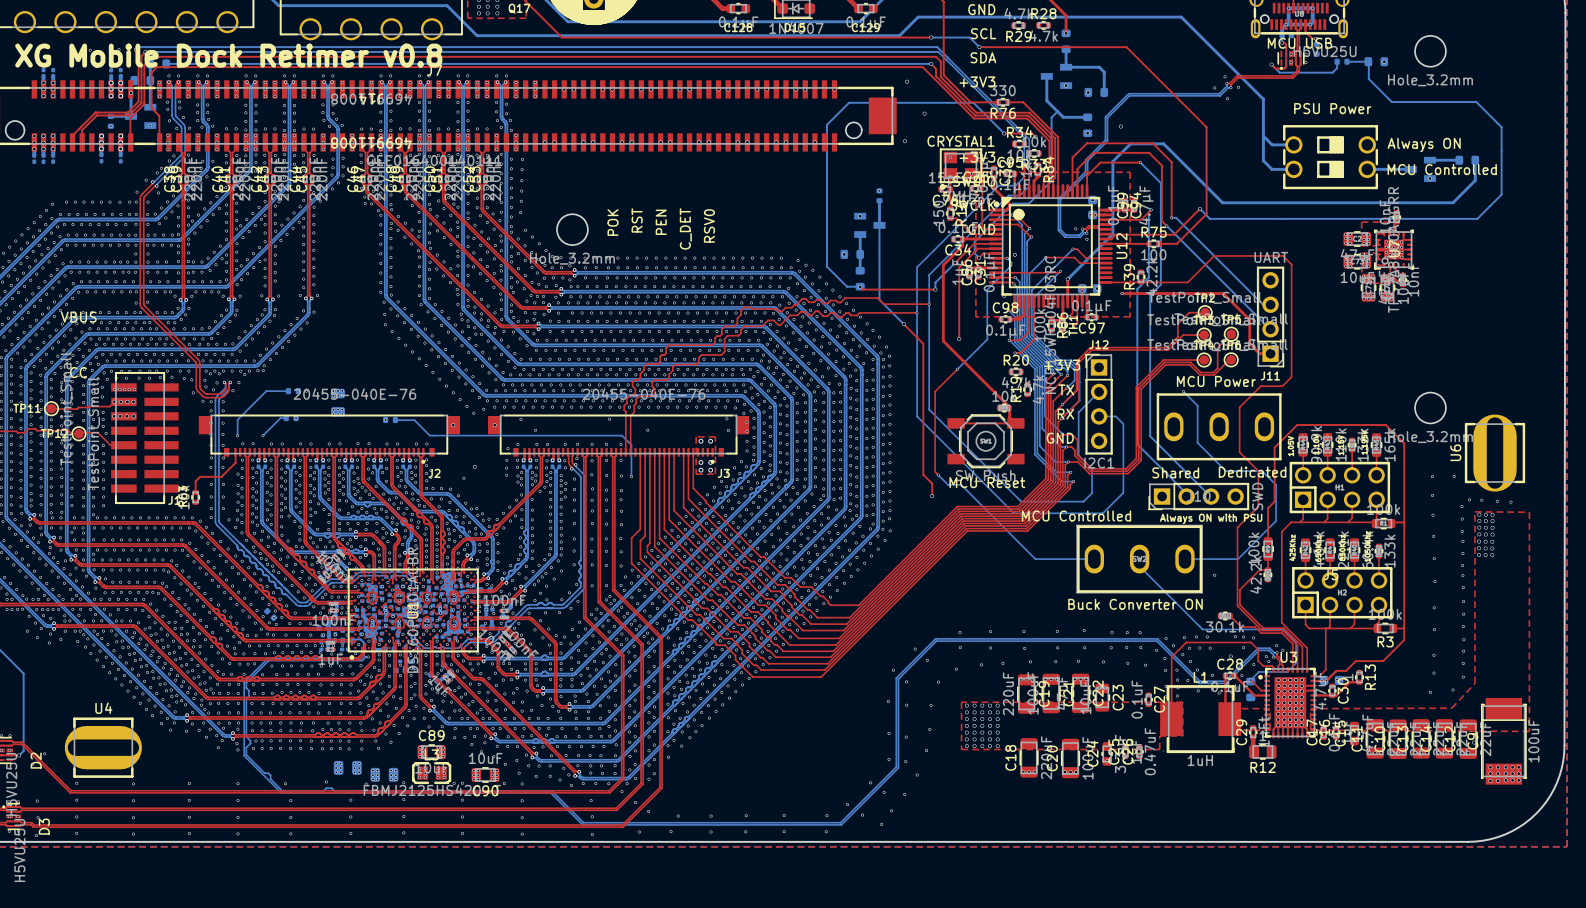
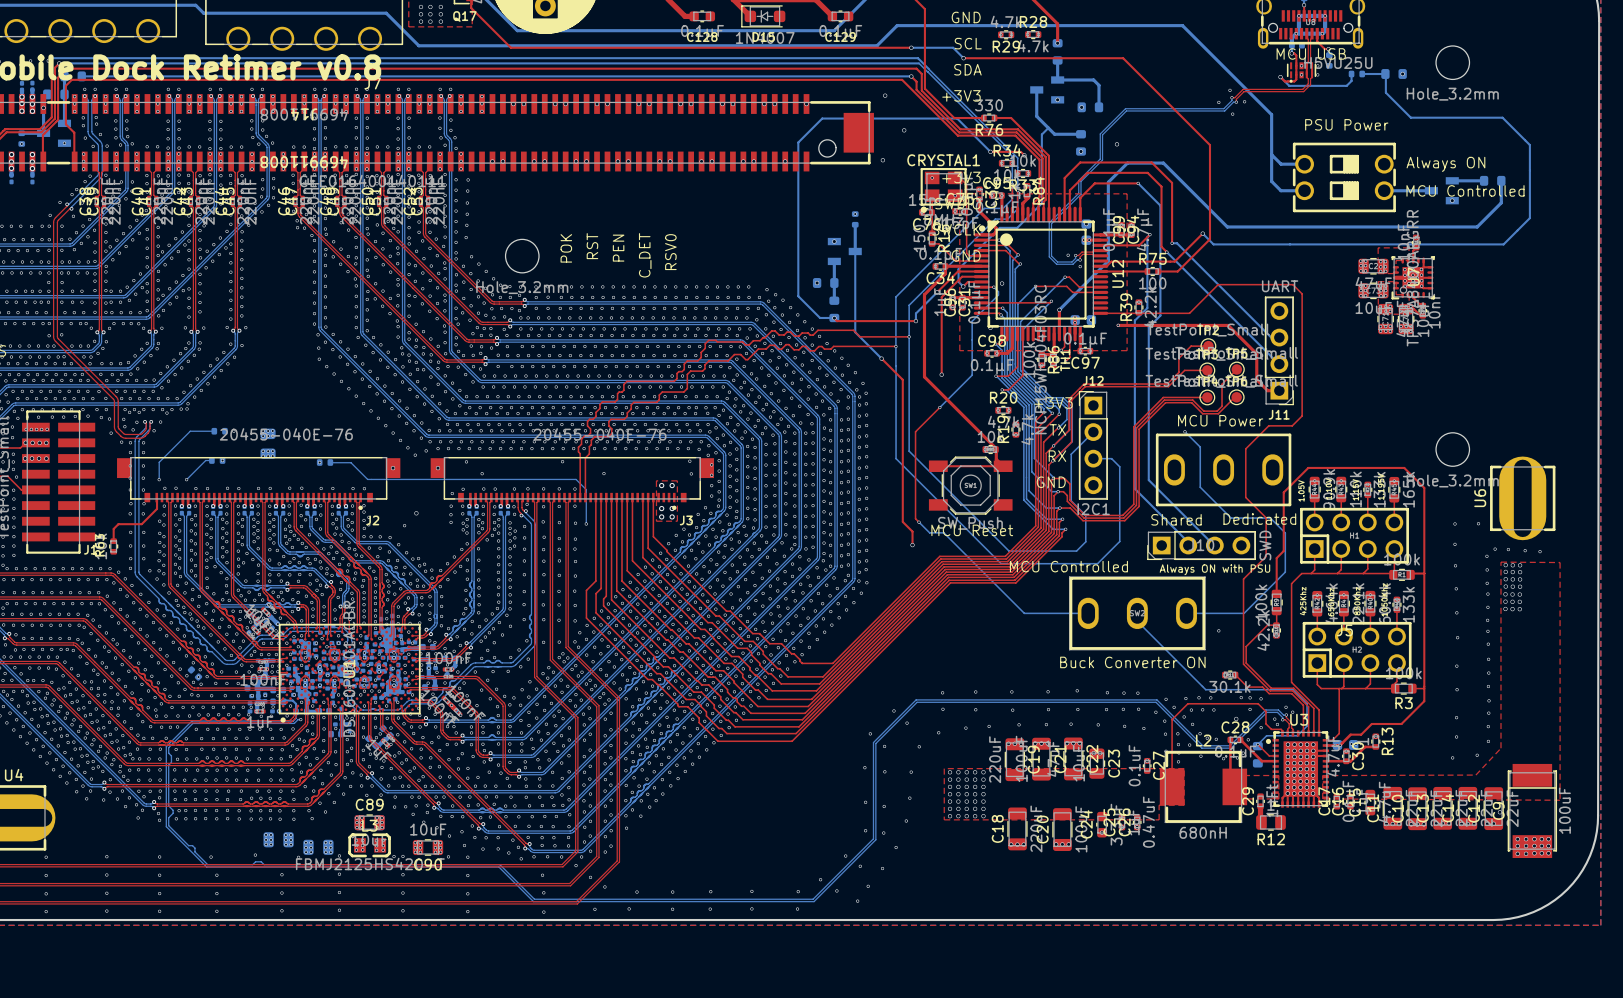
L1: 1uH (1200, 719) -> none
L2: none -> 680nH (1203, 787)

